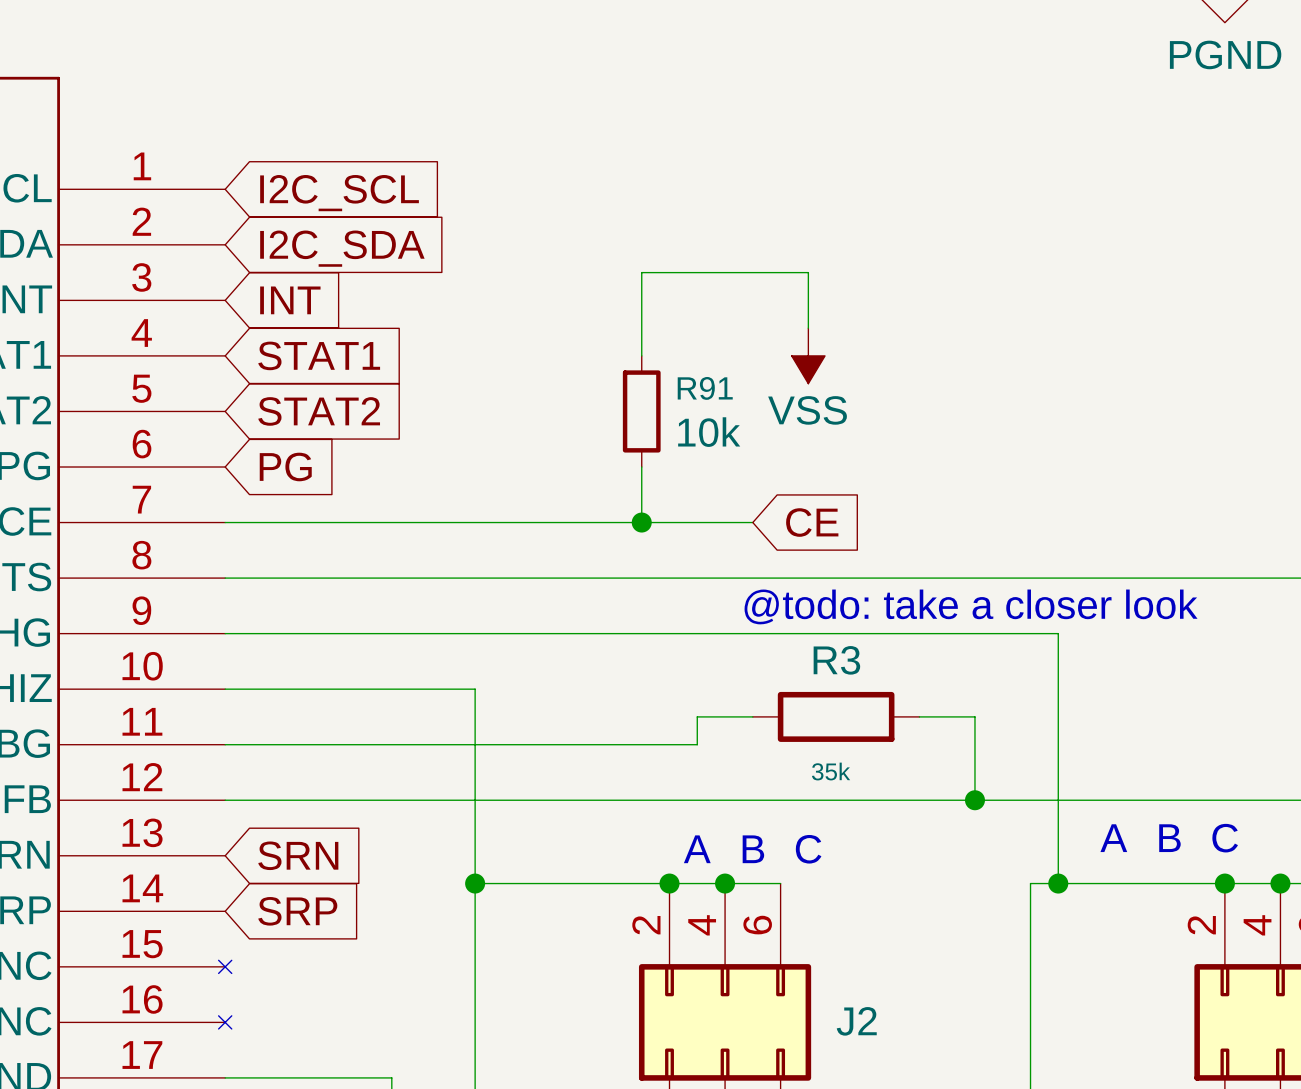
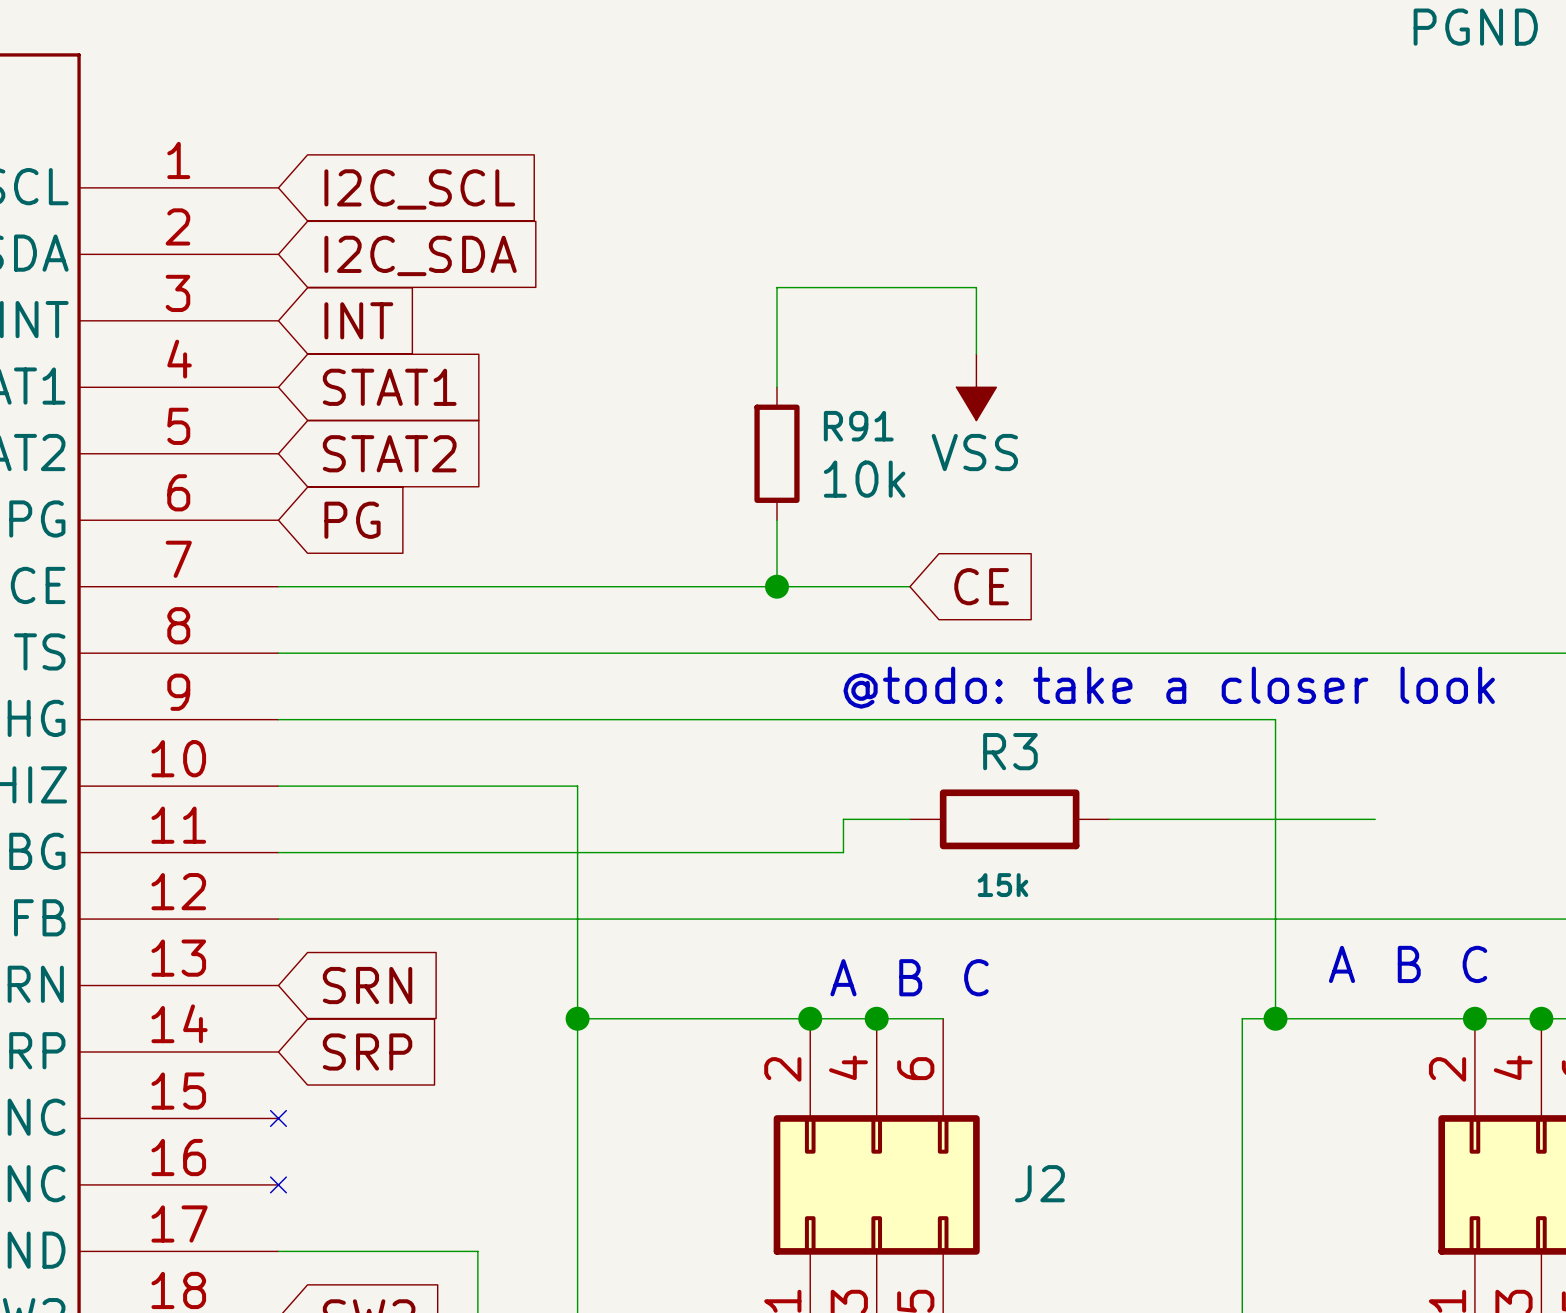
wire: (974, 716) (974, 800) -> (1175, 819) (1375, 819)
R3 value: 35k (831, 771) -> 15k (1002, 885)
junction: (974, 800) -> none

